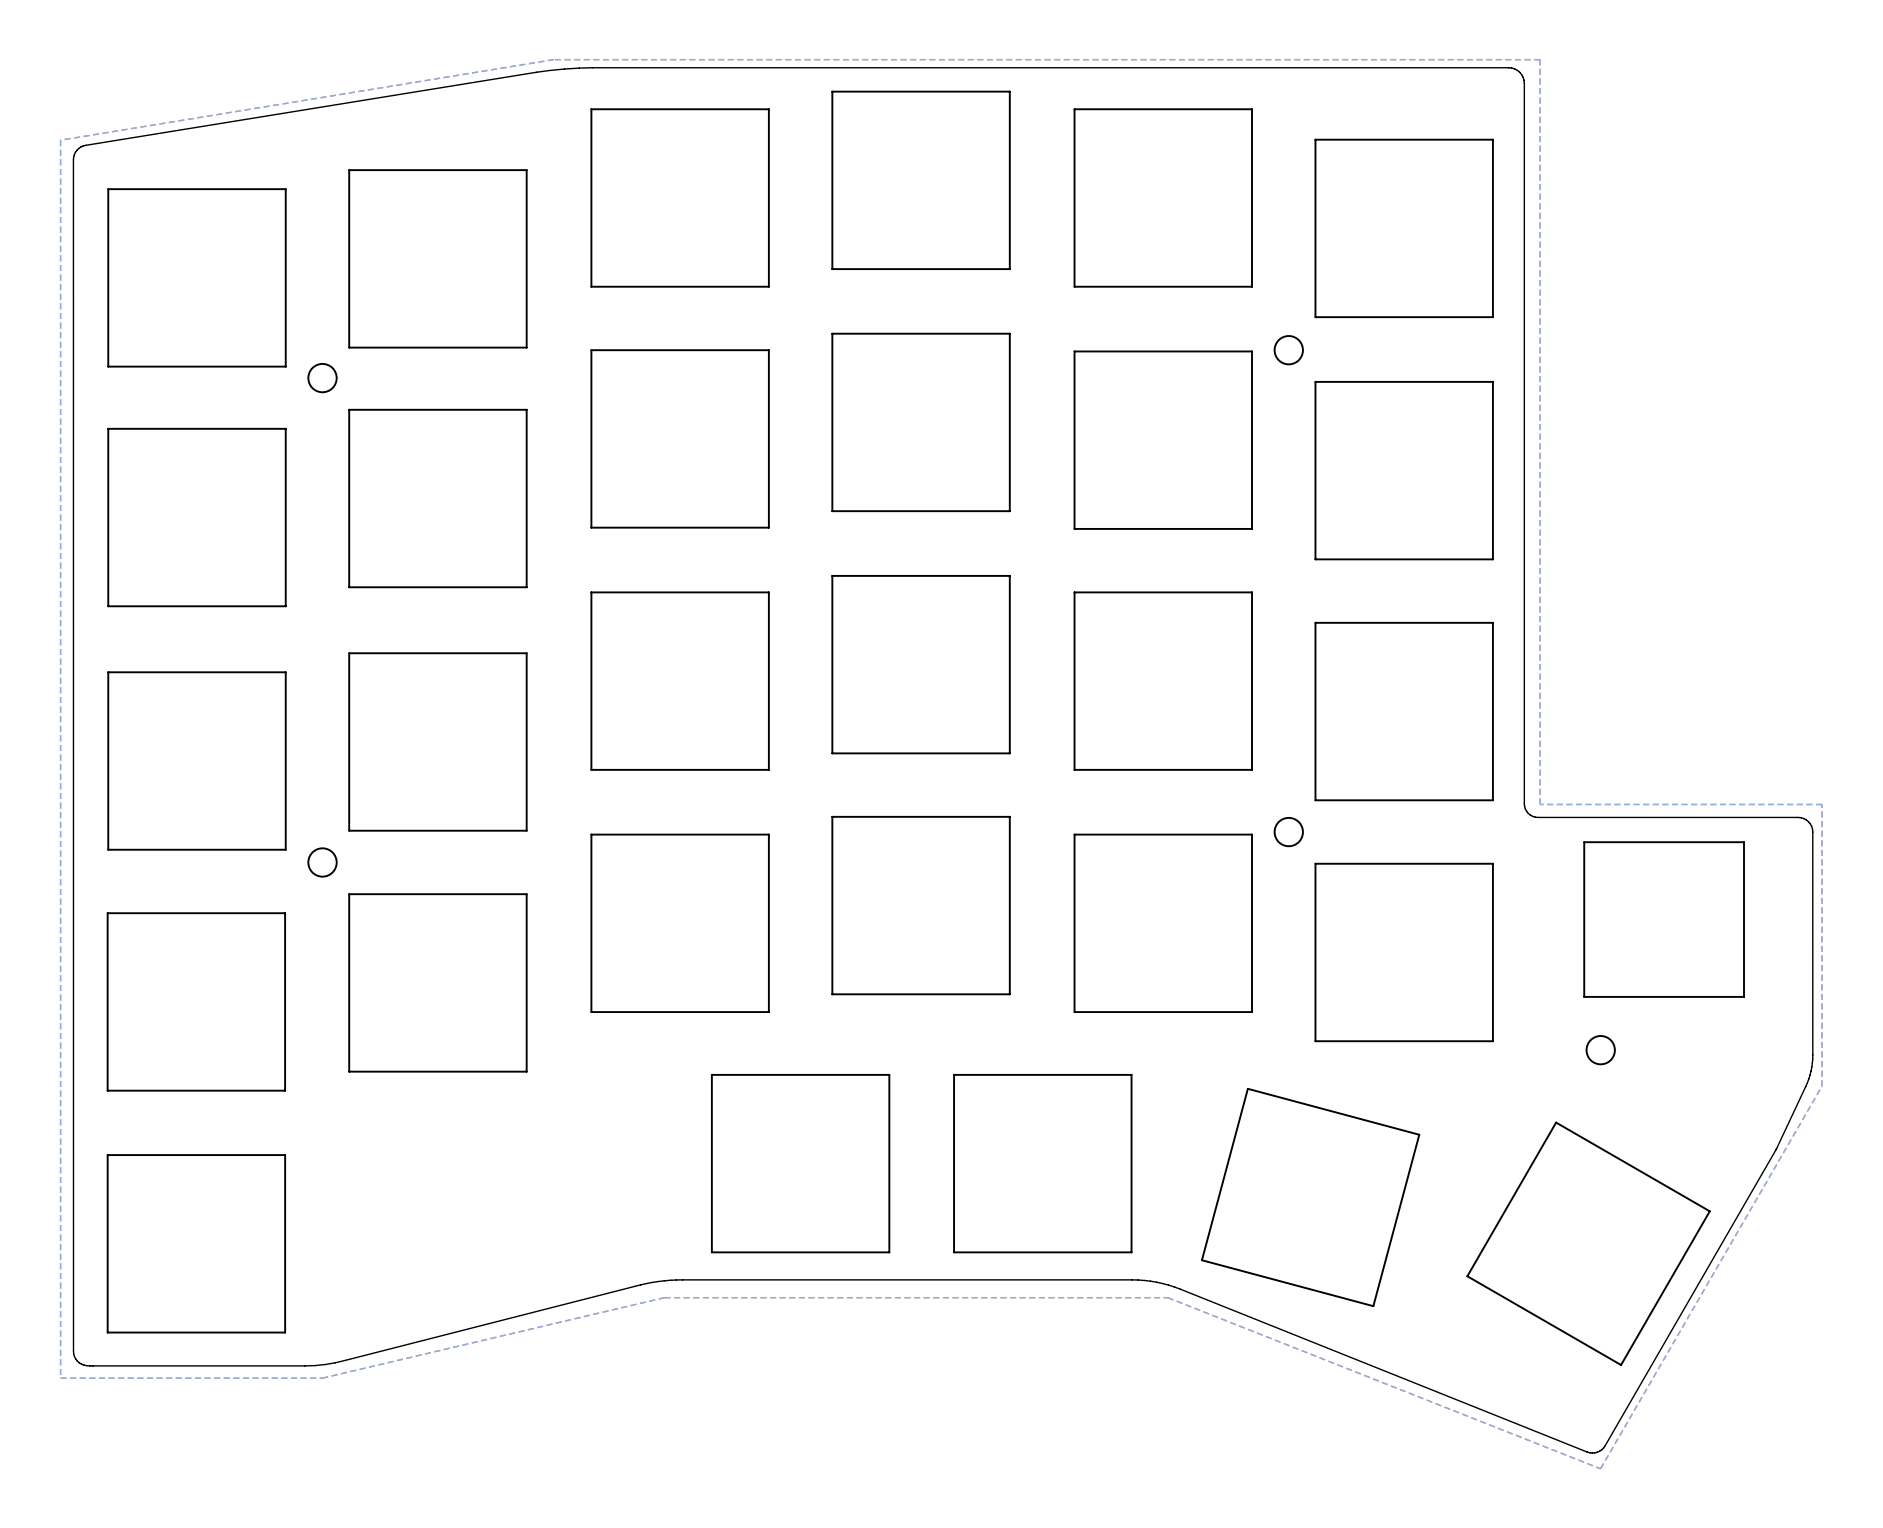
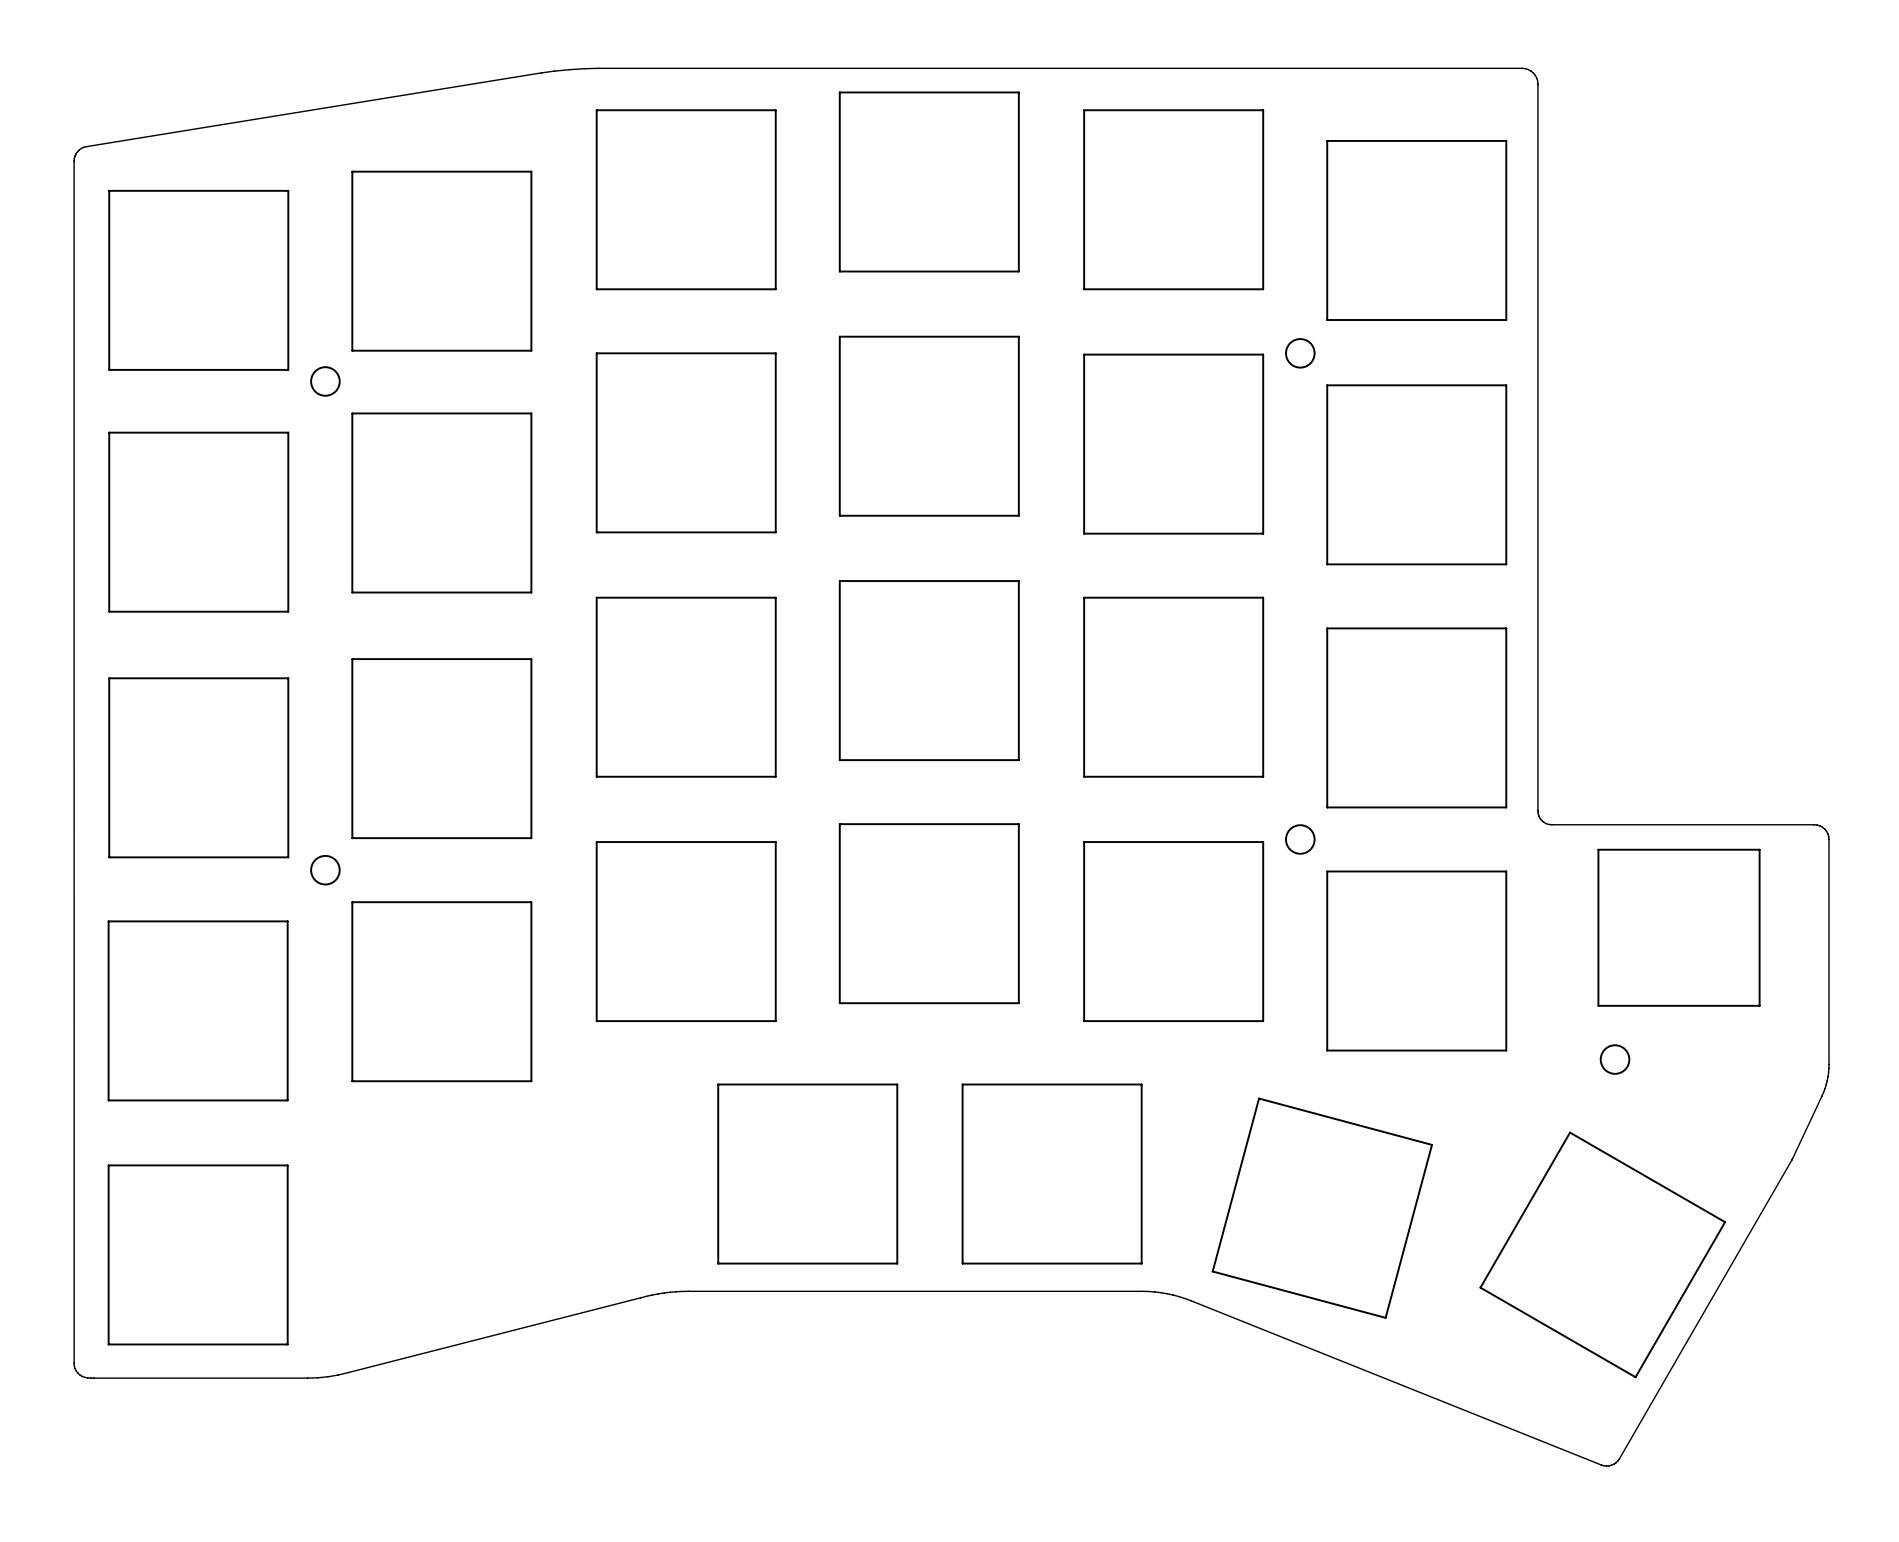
bottom zone outline: (1540, 59) (1540, 804) (1821, 804) (1821, 1086) (1600, 1468) (1167, 1297) (664, 1297) (322, 1378) (60, 1378) (60, 140) (553, 59) (1540, 59) -> none

